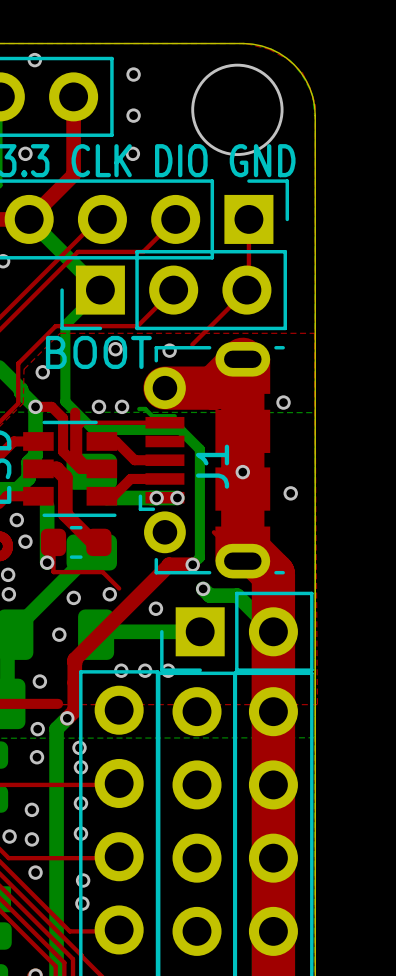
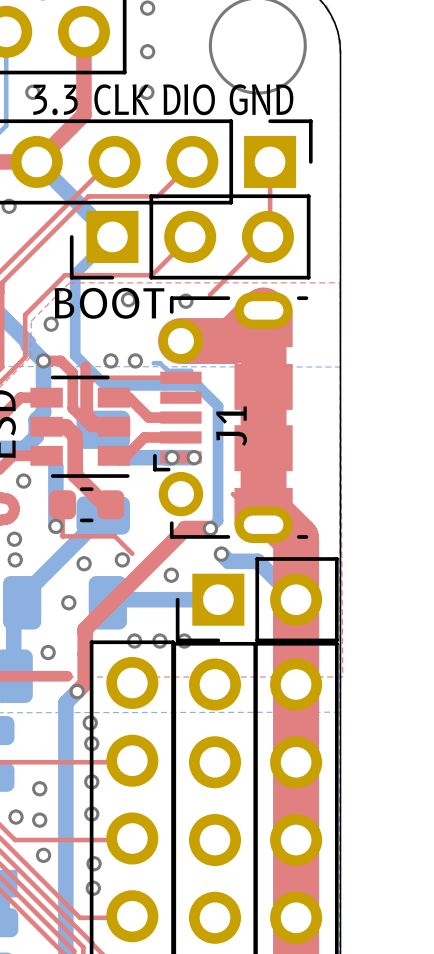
via: (283, 402) -> none
via: (242, 472) -> none
via: (290, 493) -> none
via: (25, 541) -> none
via: (37, 729) -> none
via: (36, 757) -> none

